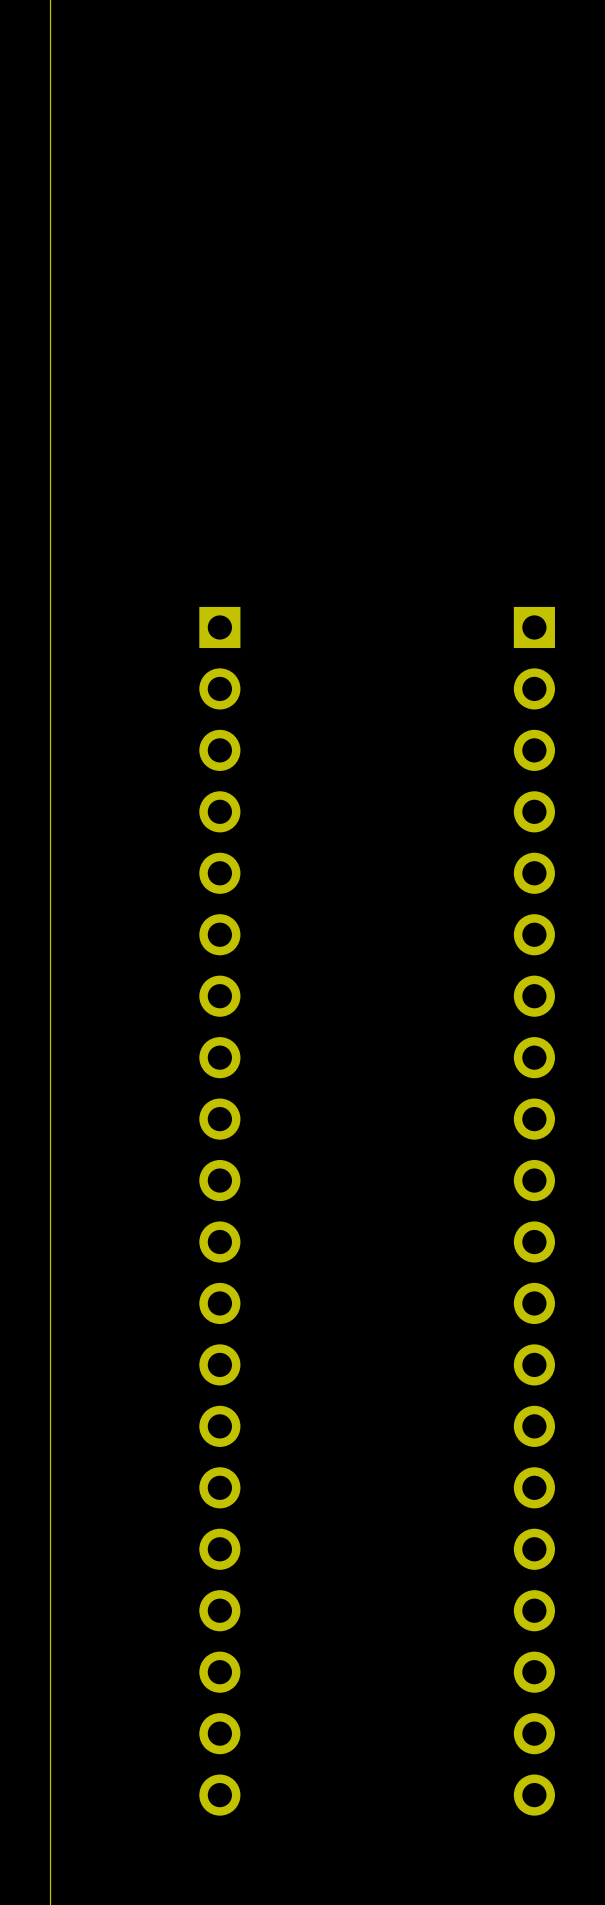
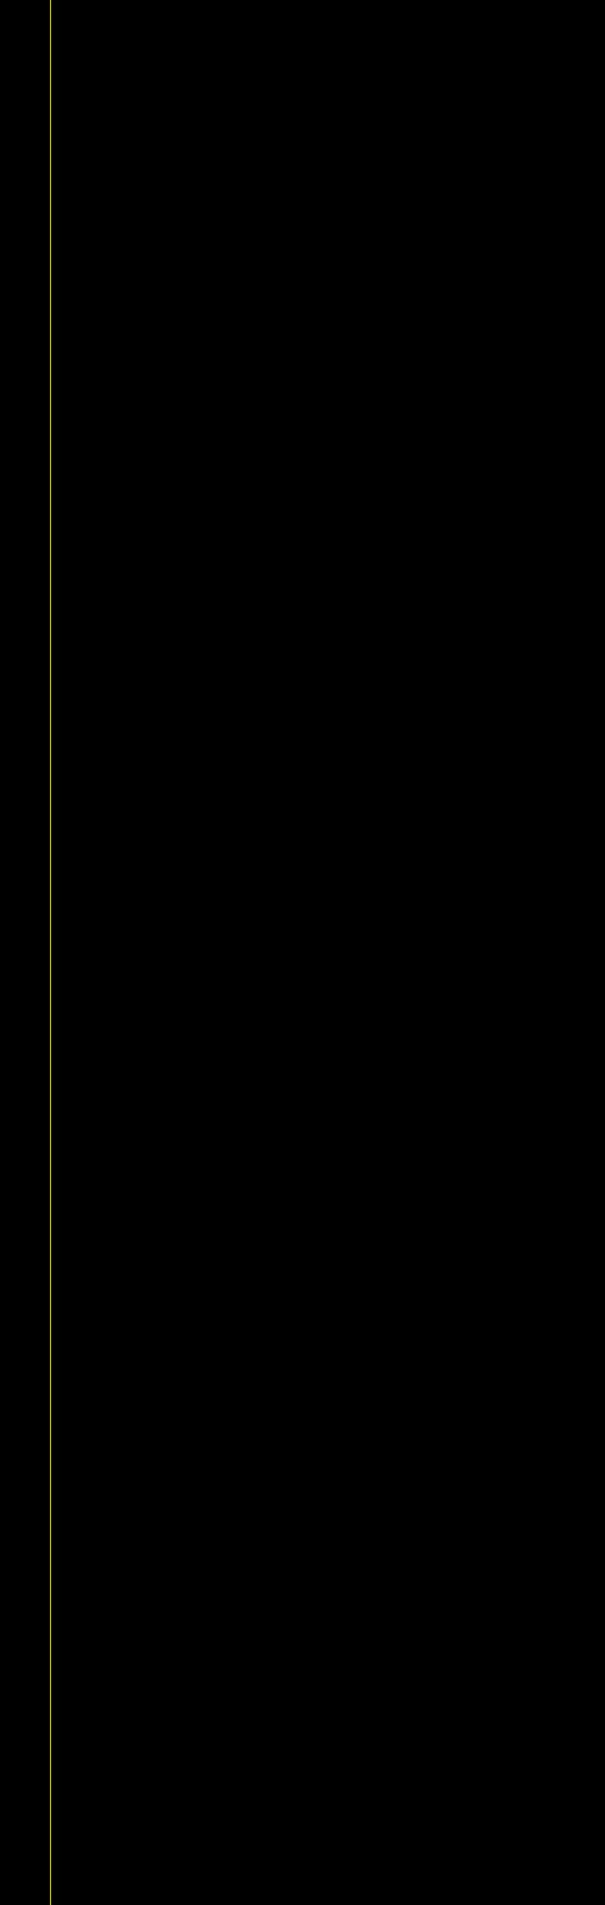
part: (219, 1211) -> none
part: (534, 1211) -> none

